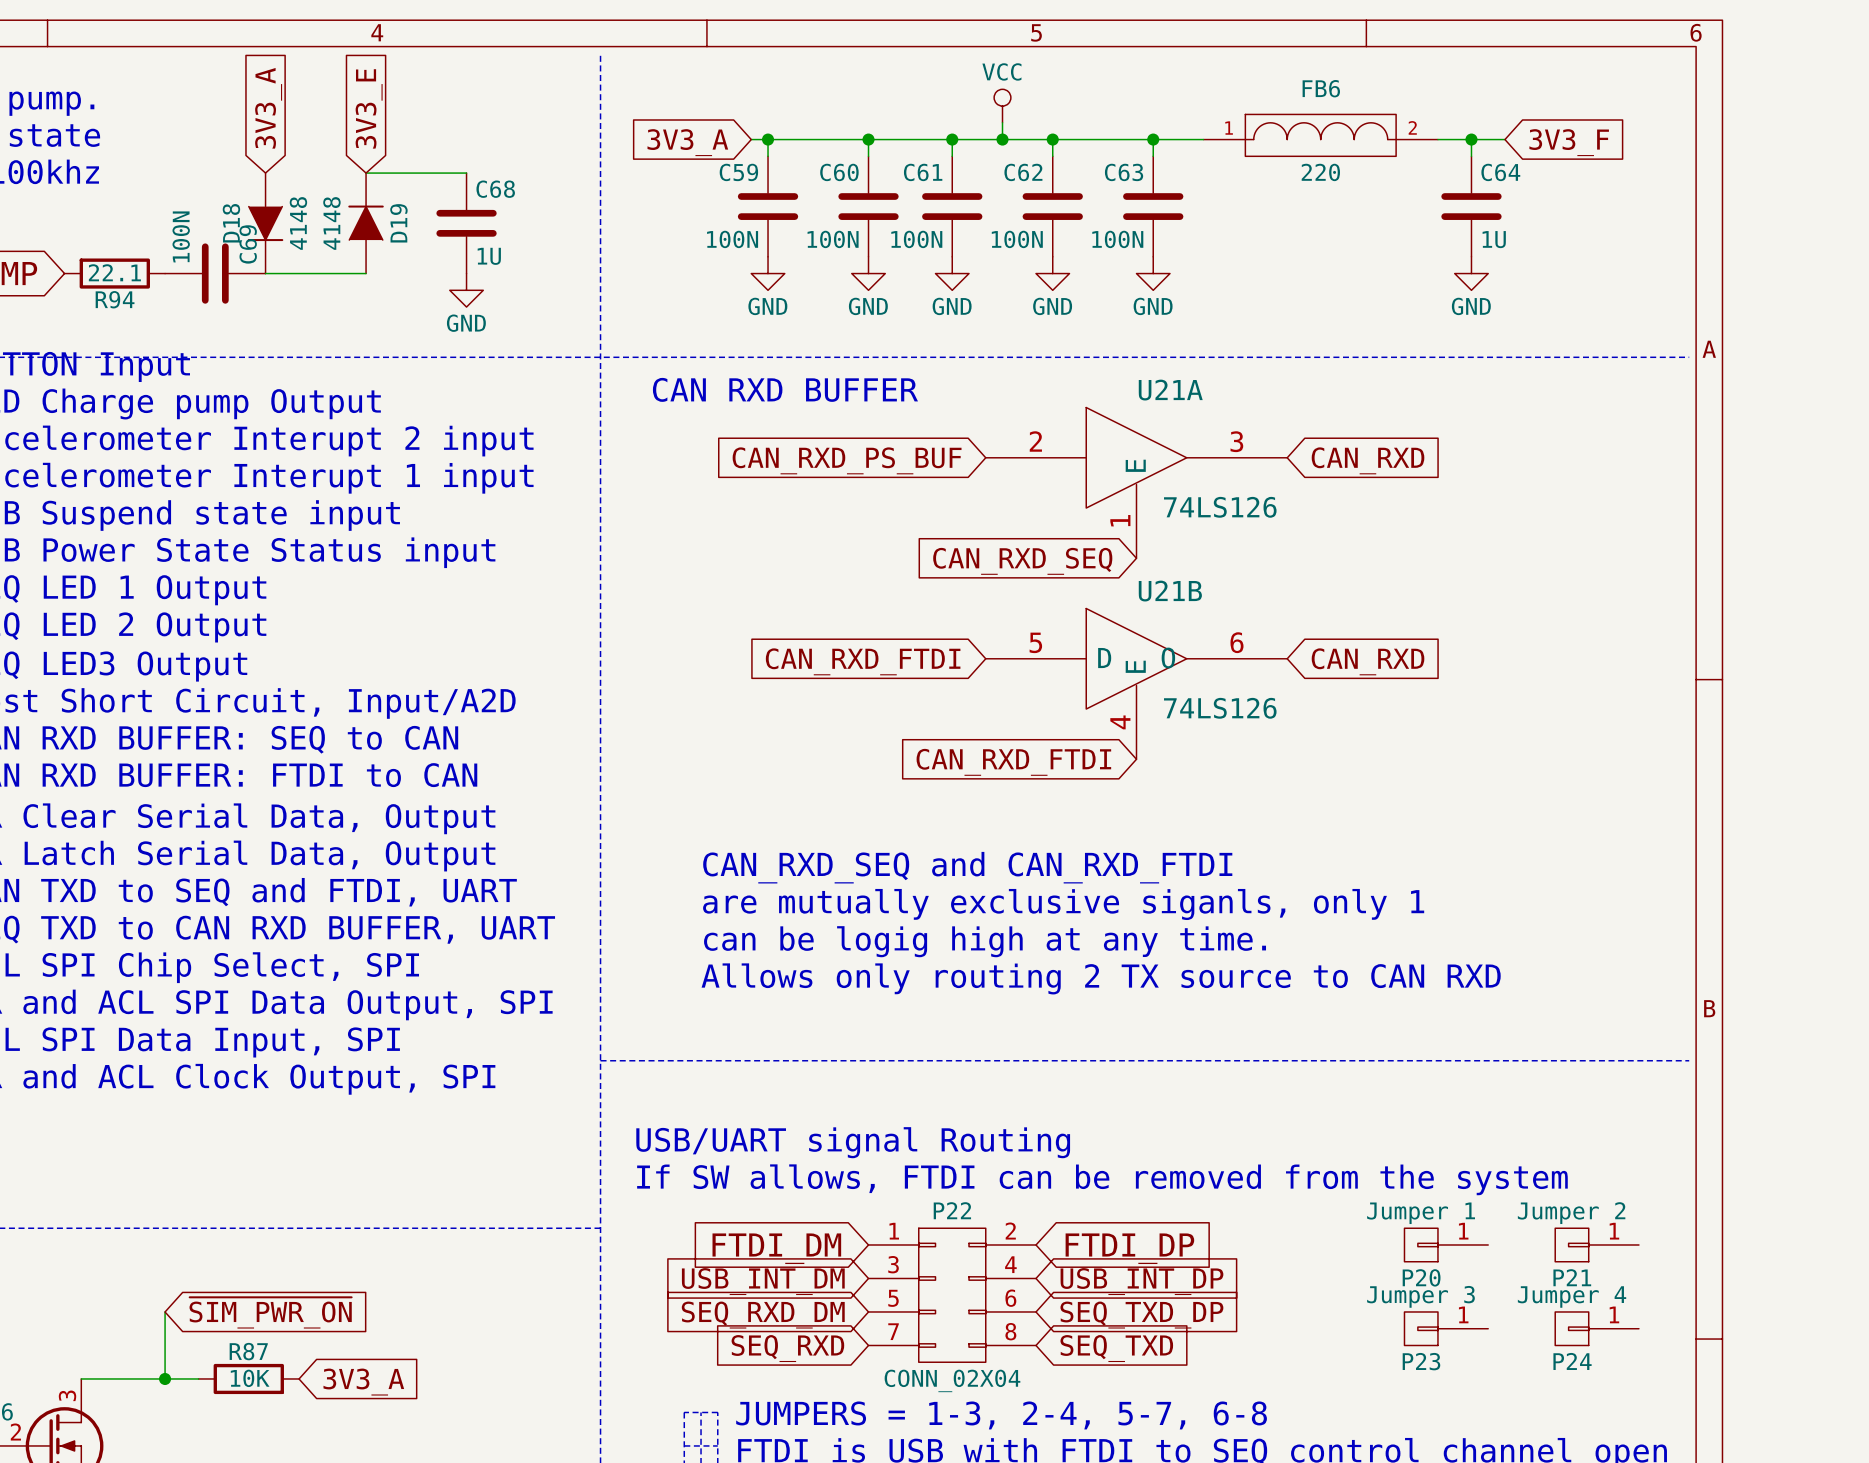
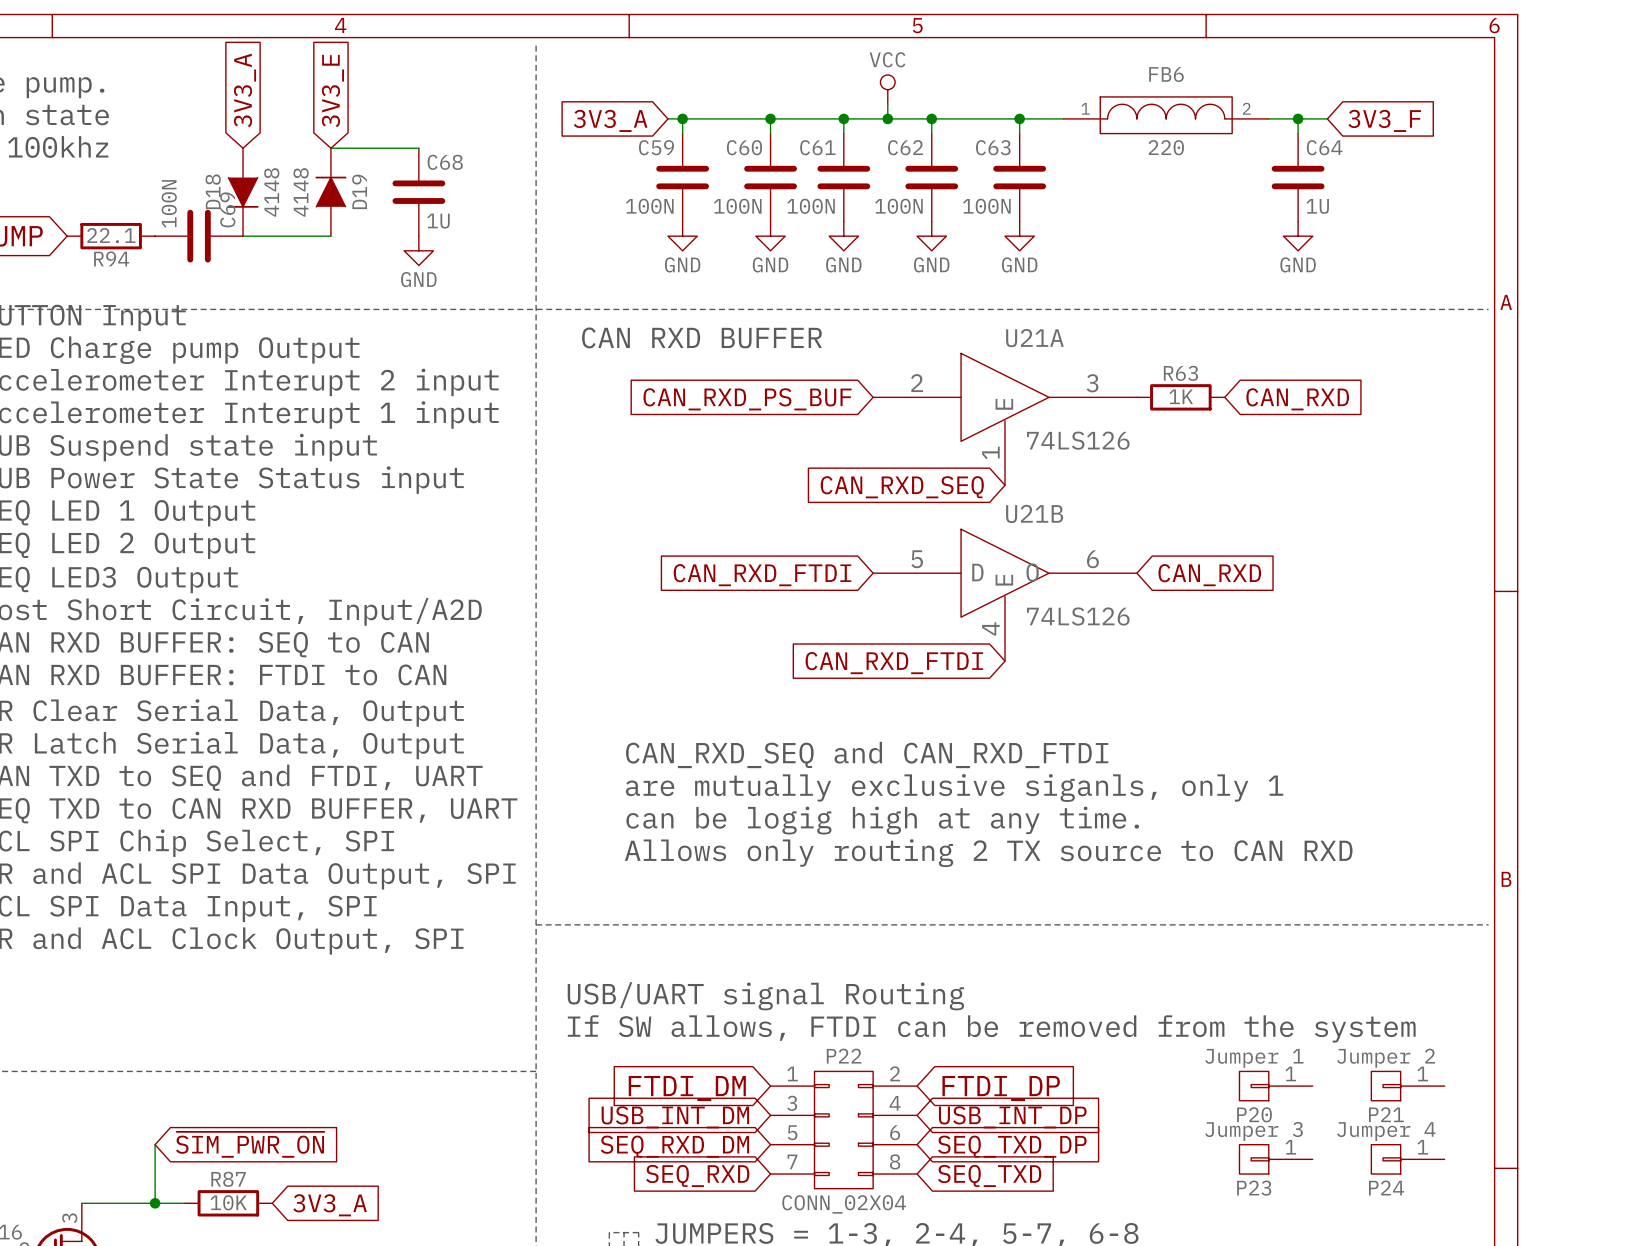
R63: none -> 1K (1180, 397)
global label position: CAN_RXD (1368, 460) -> CAN_RXD (1297, 399)

